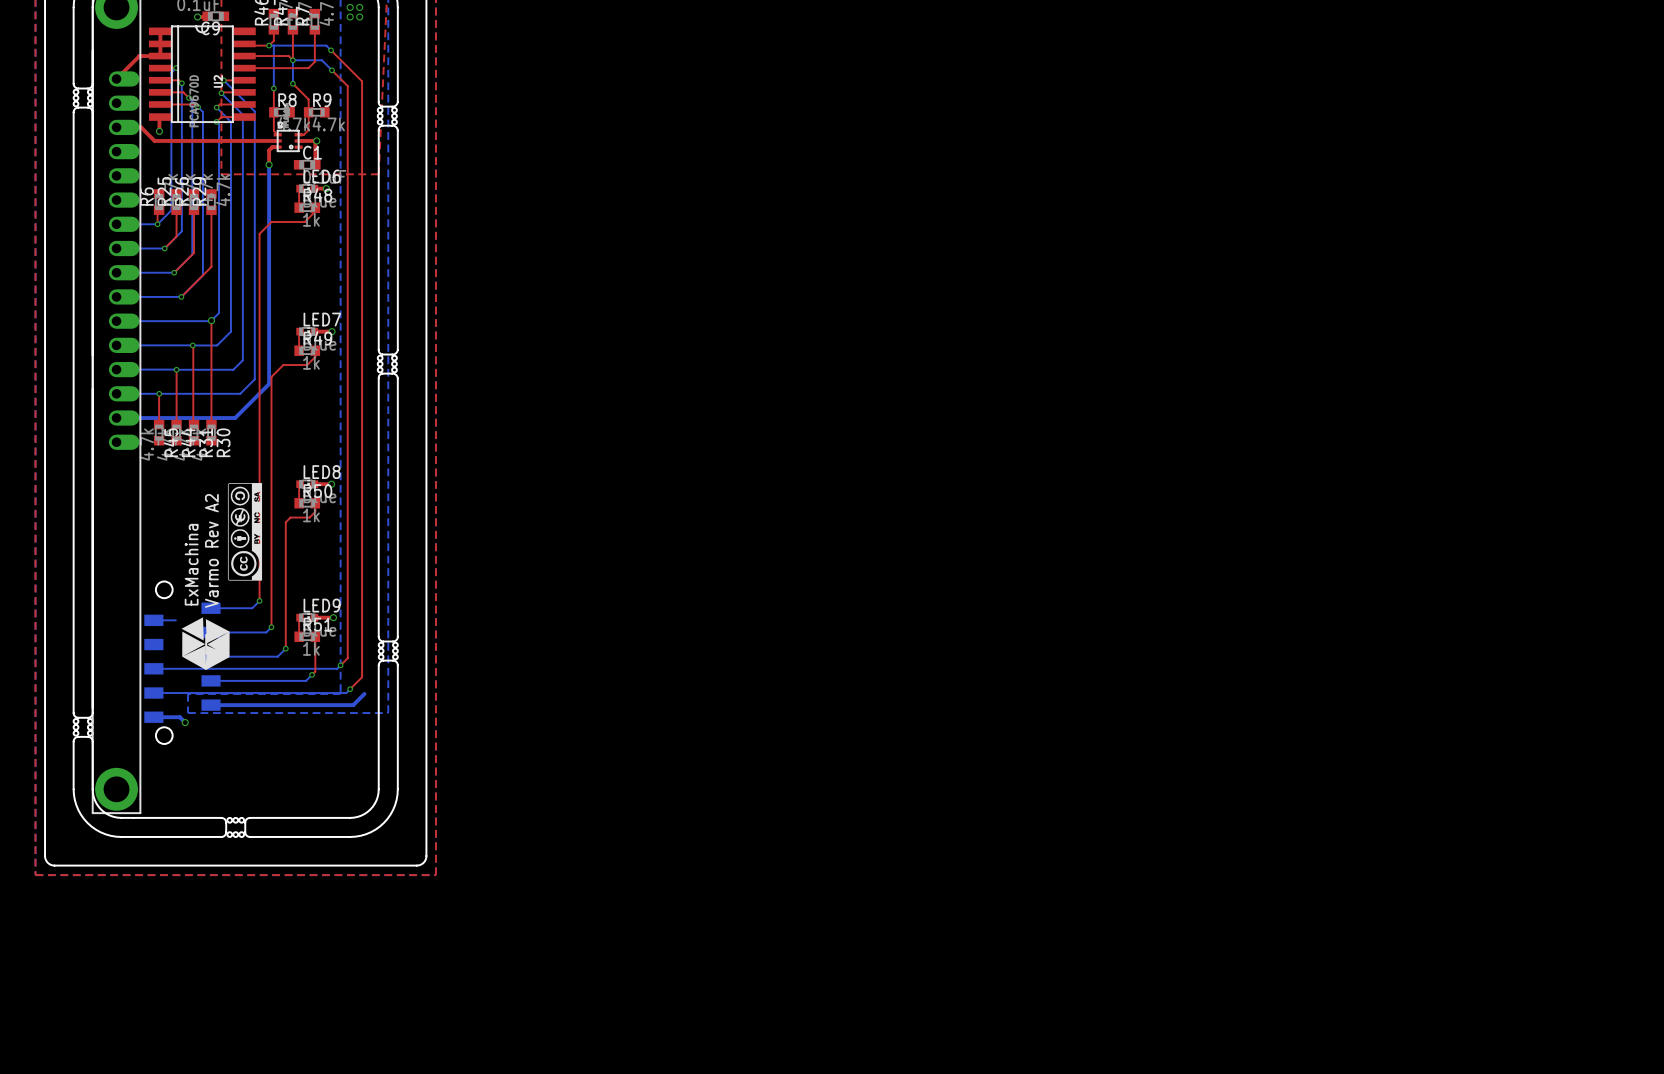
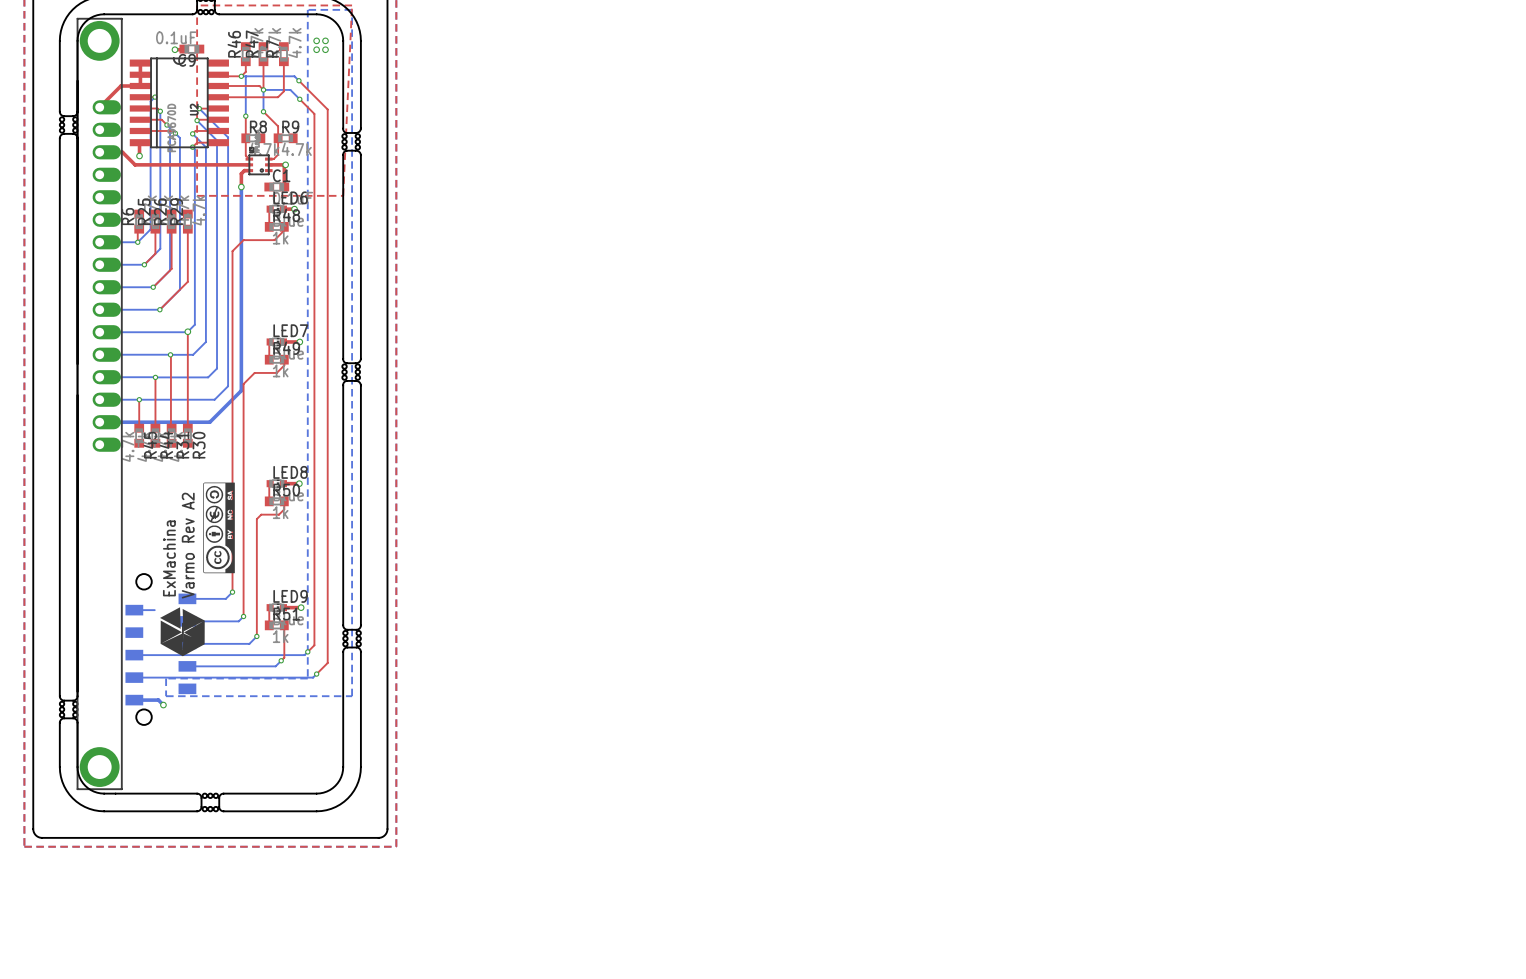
bottom track: (364, 693) (353, 705) (211, 705) -> none

